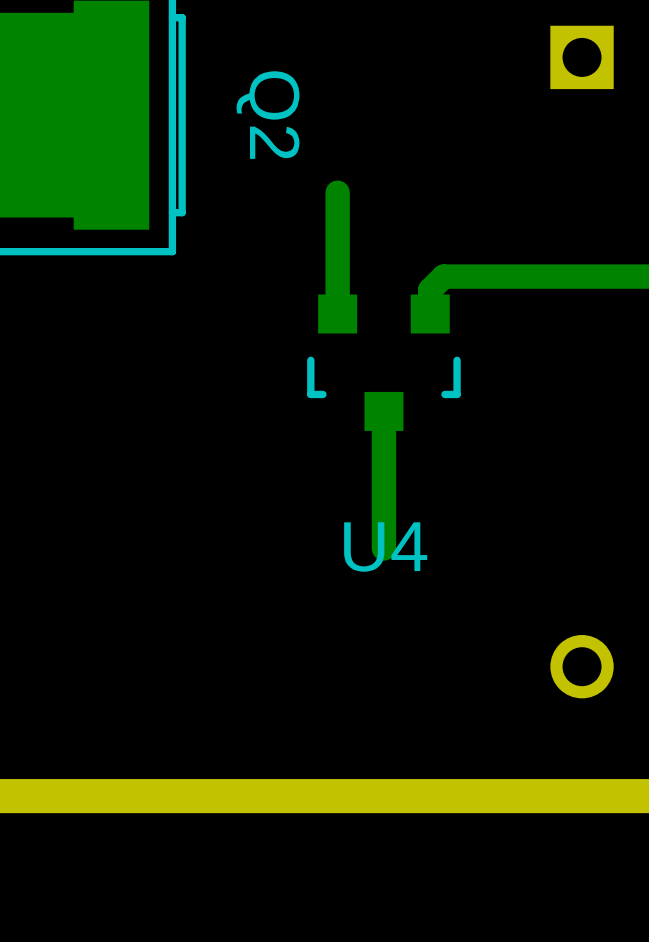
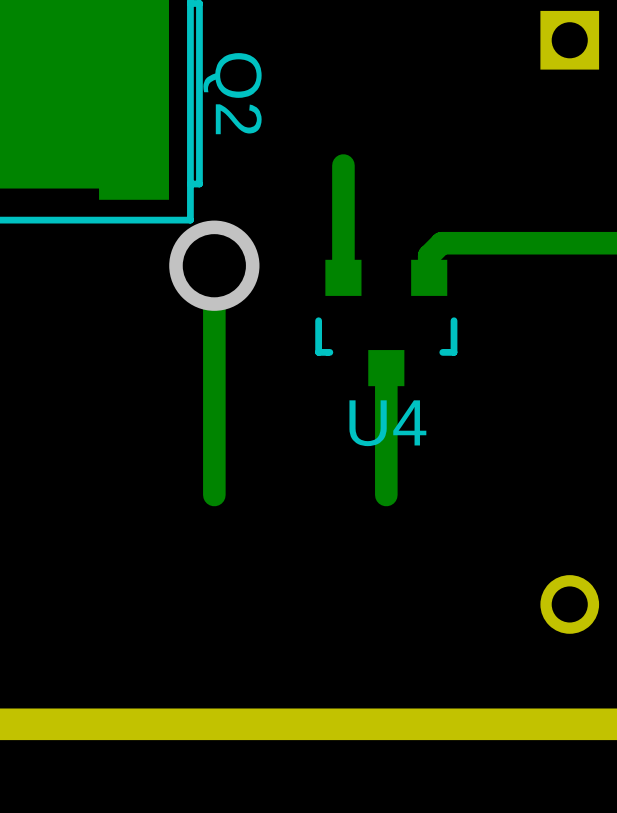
Q2 name position: Q2 (268, 115) -> Q2 (232, 93)
track: none -> (214, 265) (214, 495)
via: none -> (214, 265)
U4 name position: U4 (385, 547) -> U4 (387, 423)

